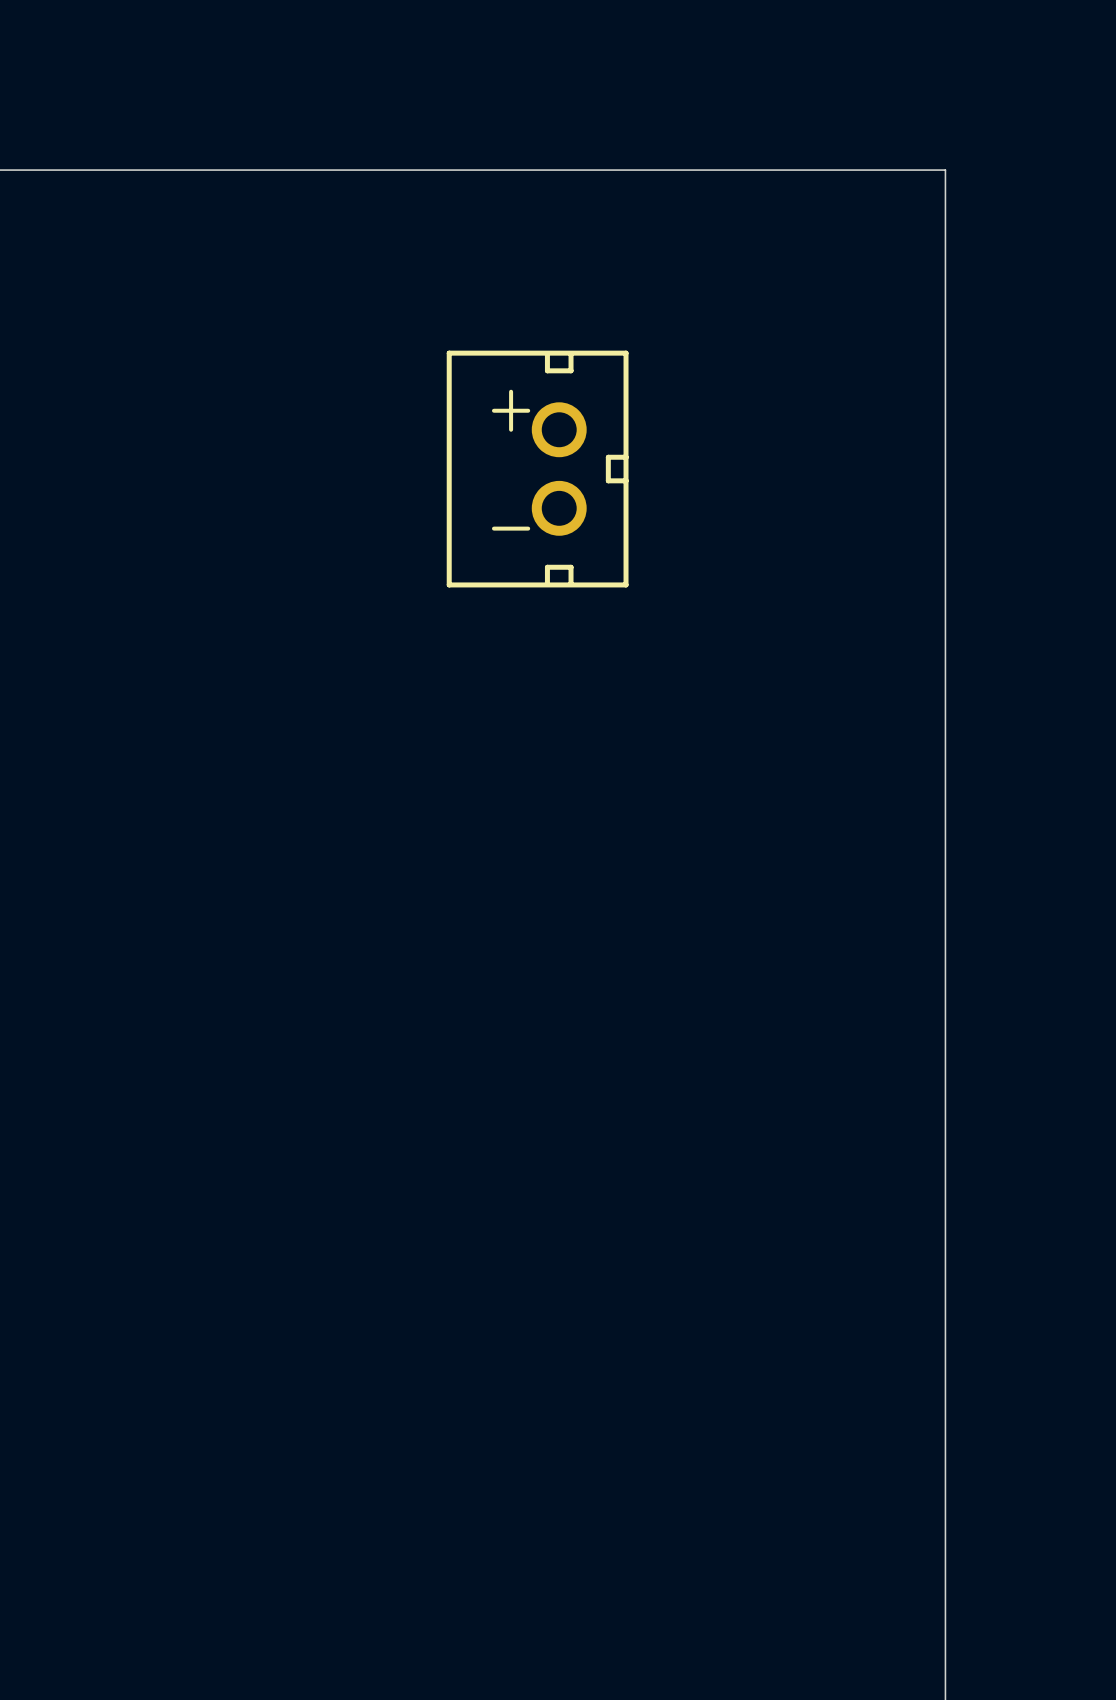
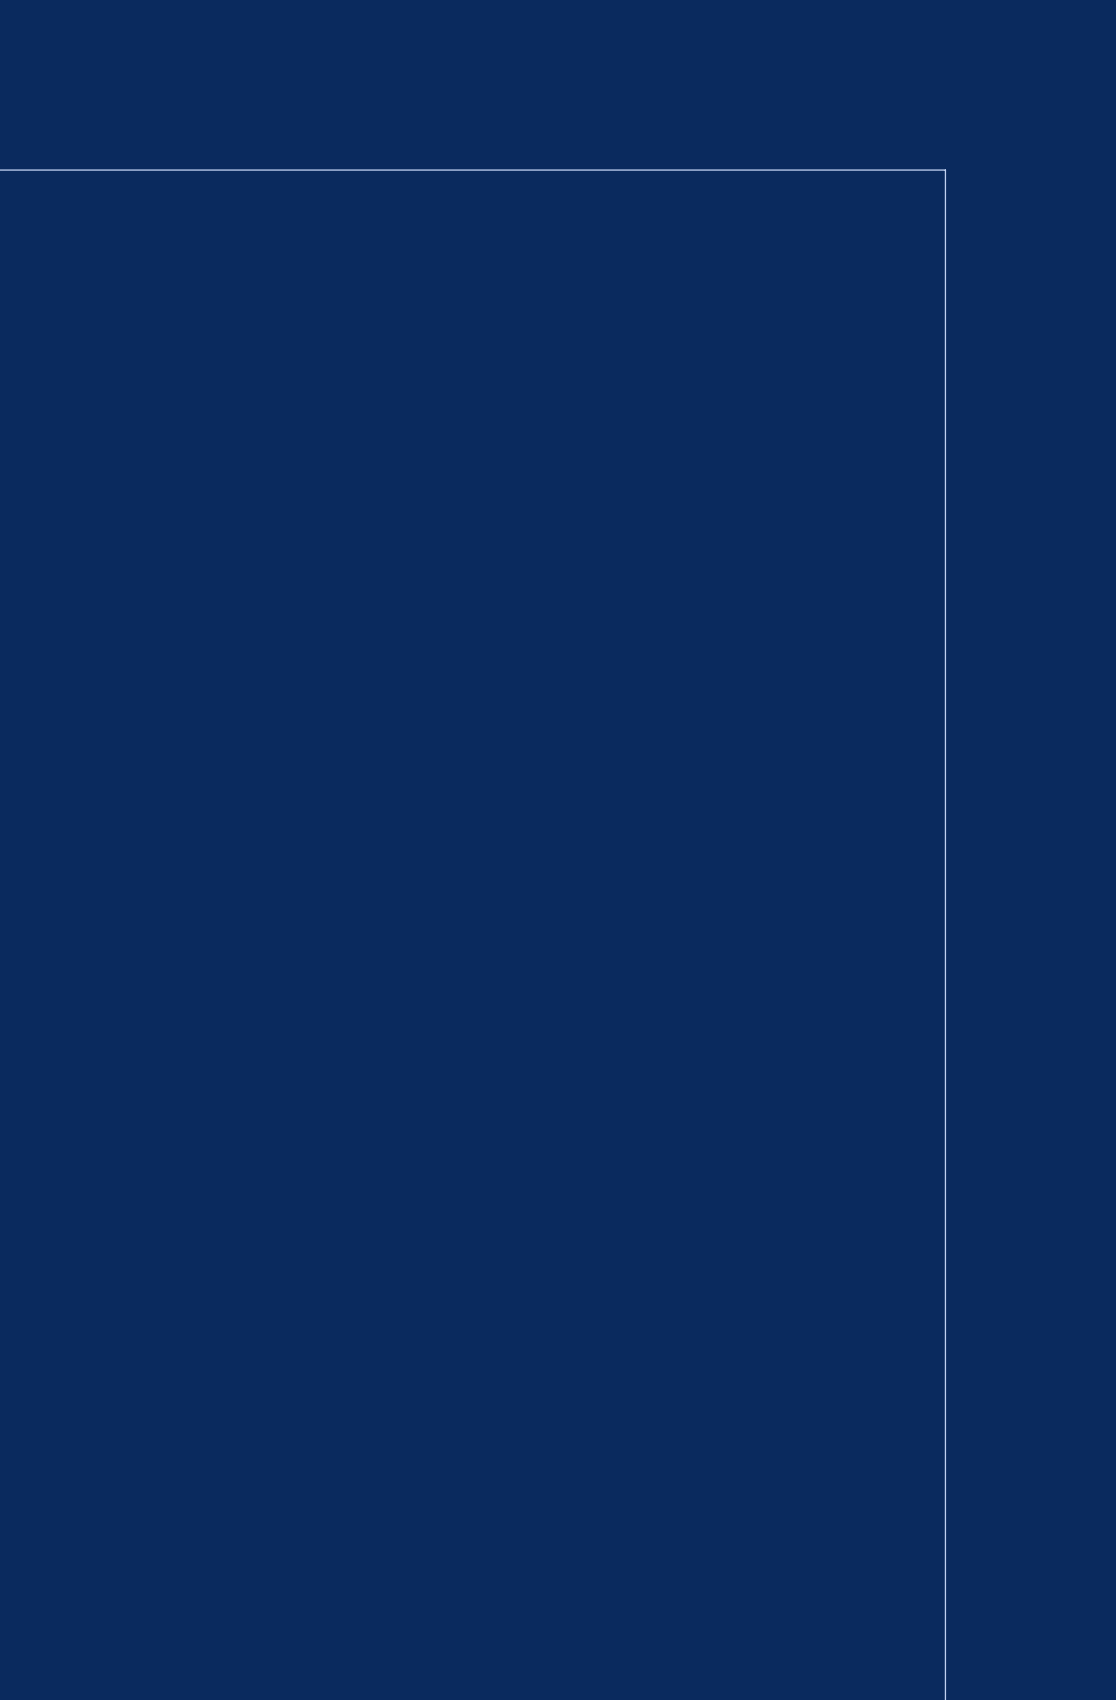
part: (537, 469) -> none

